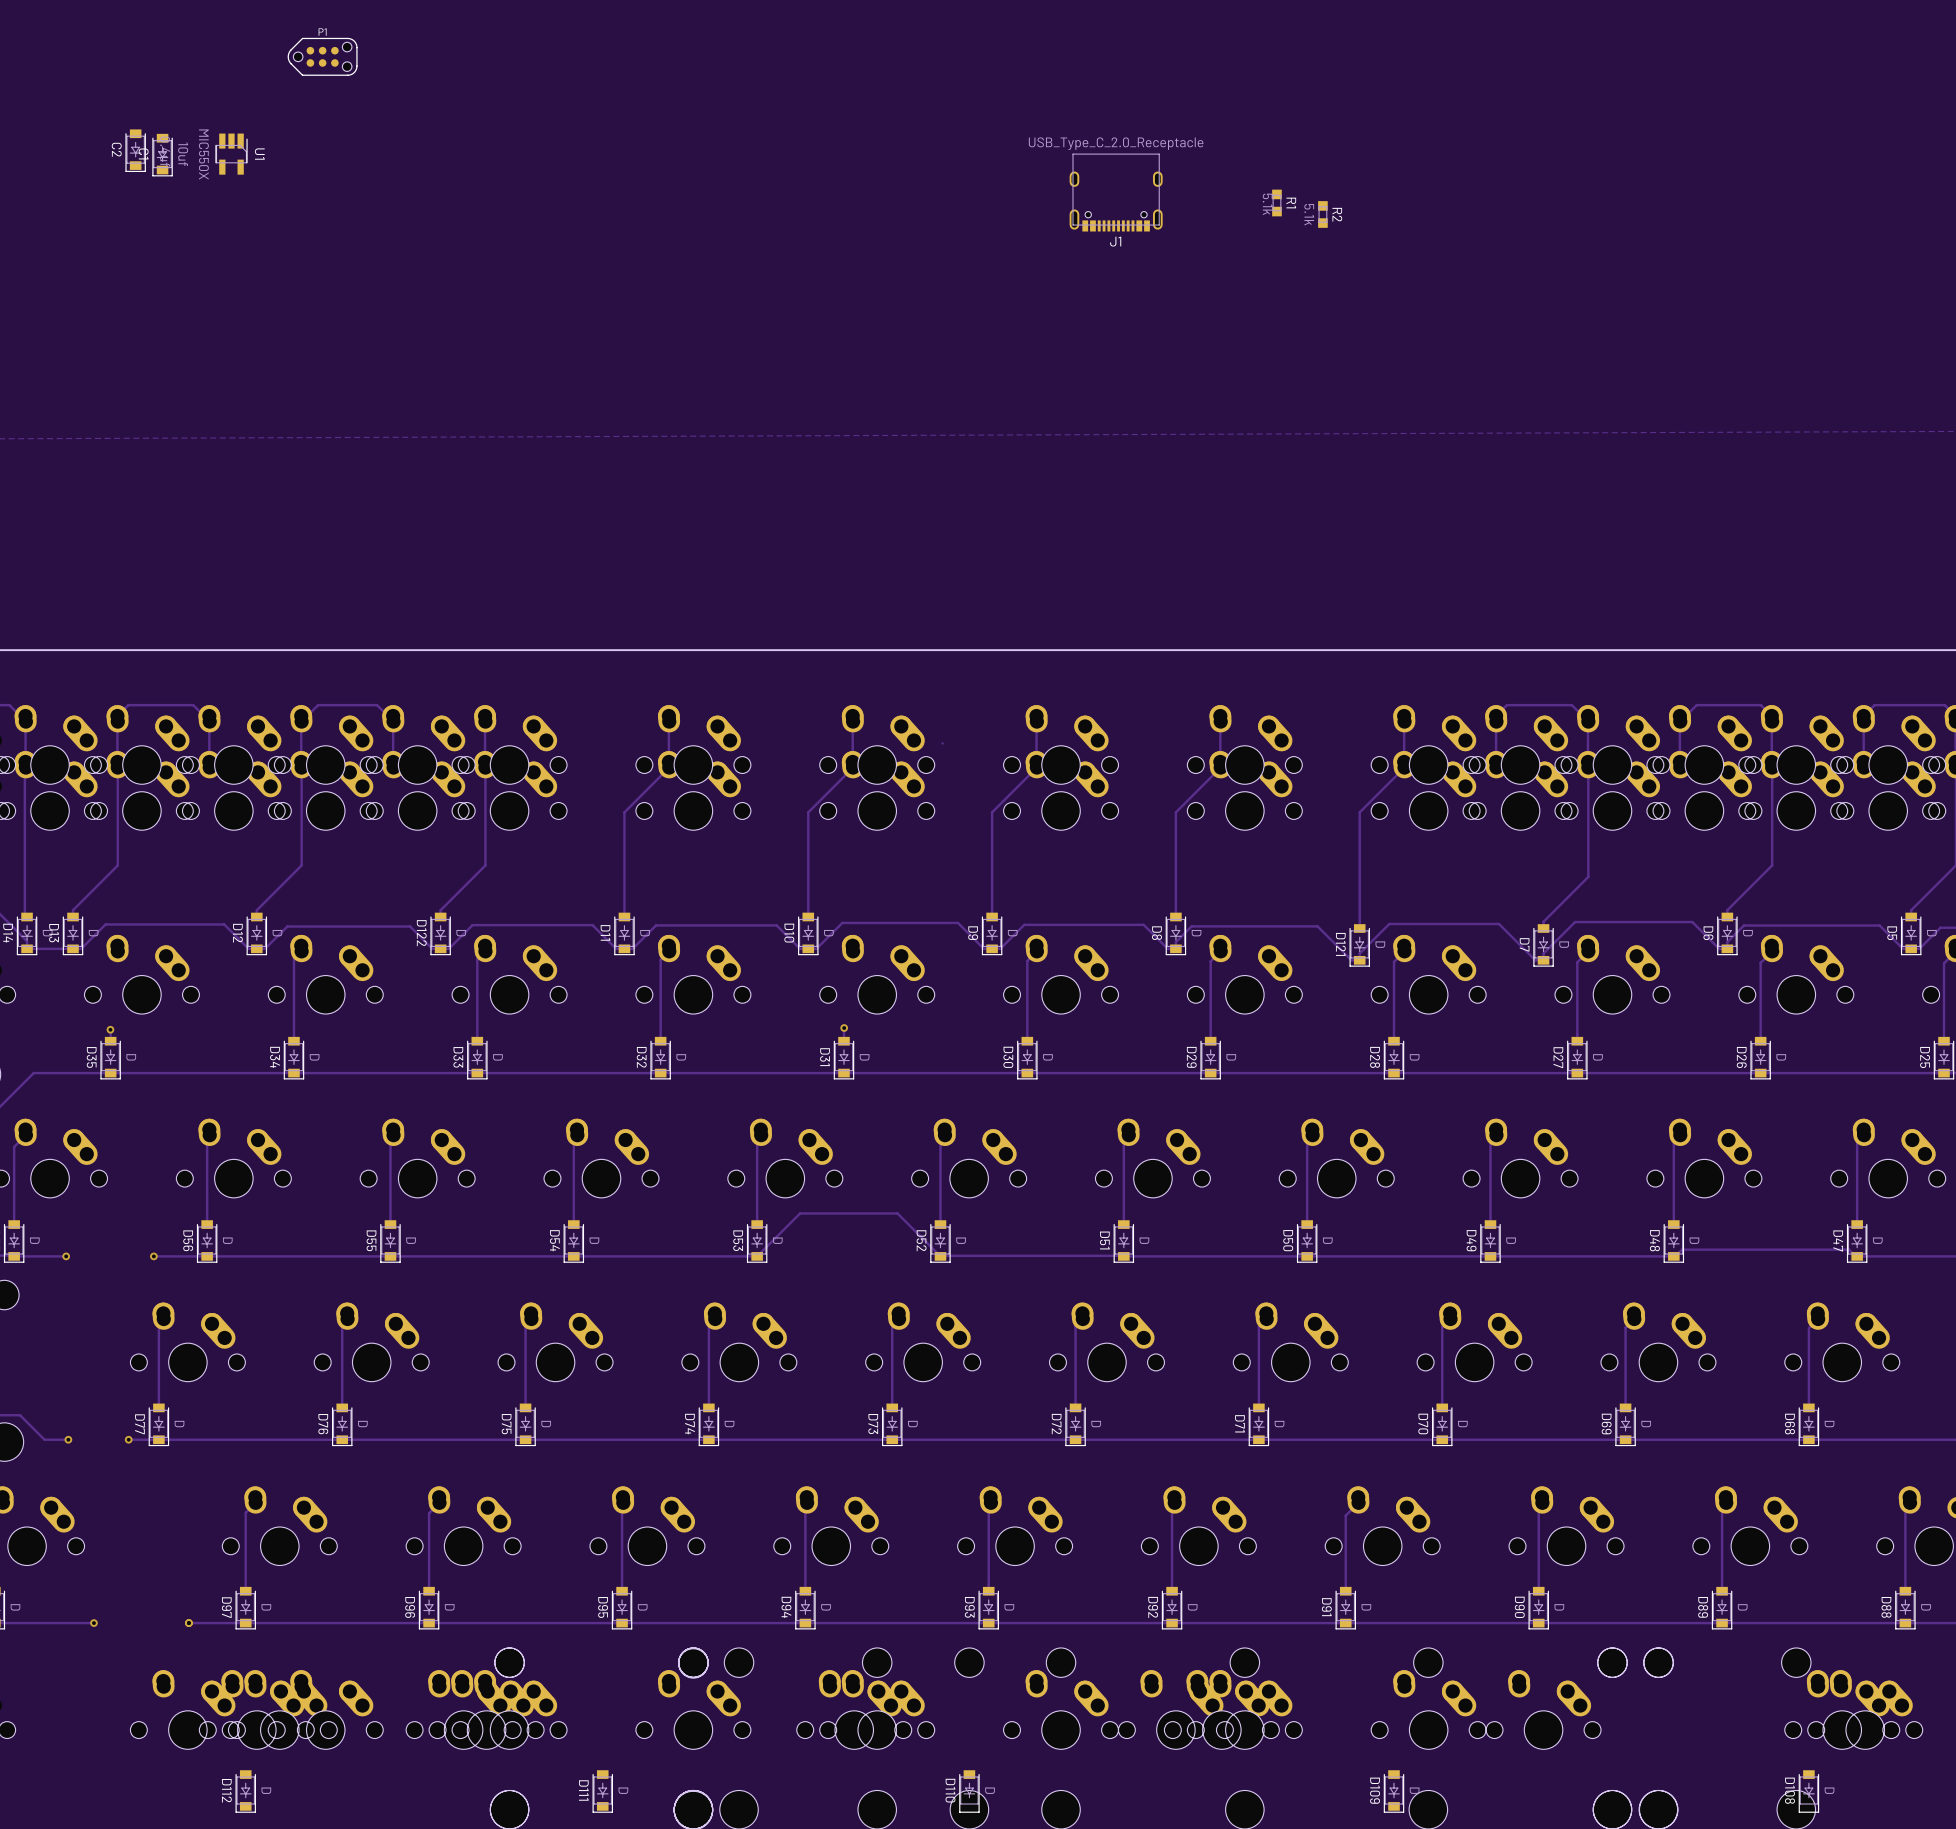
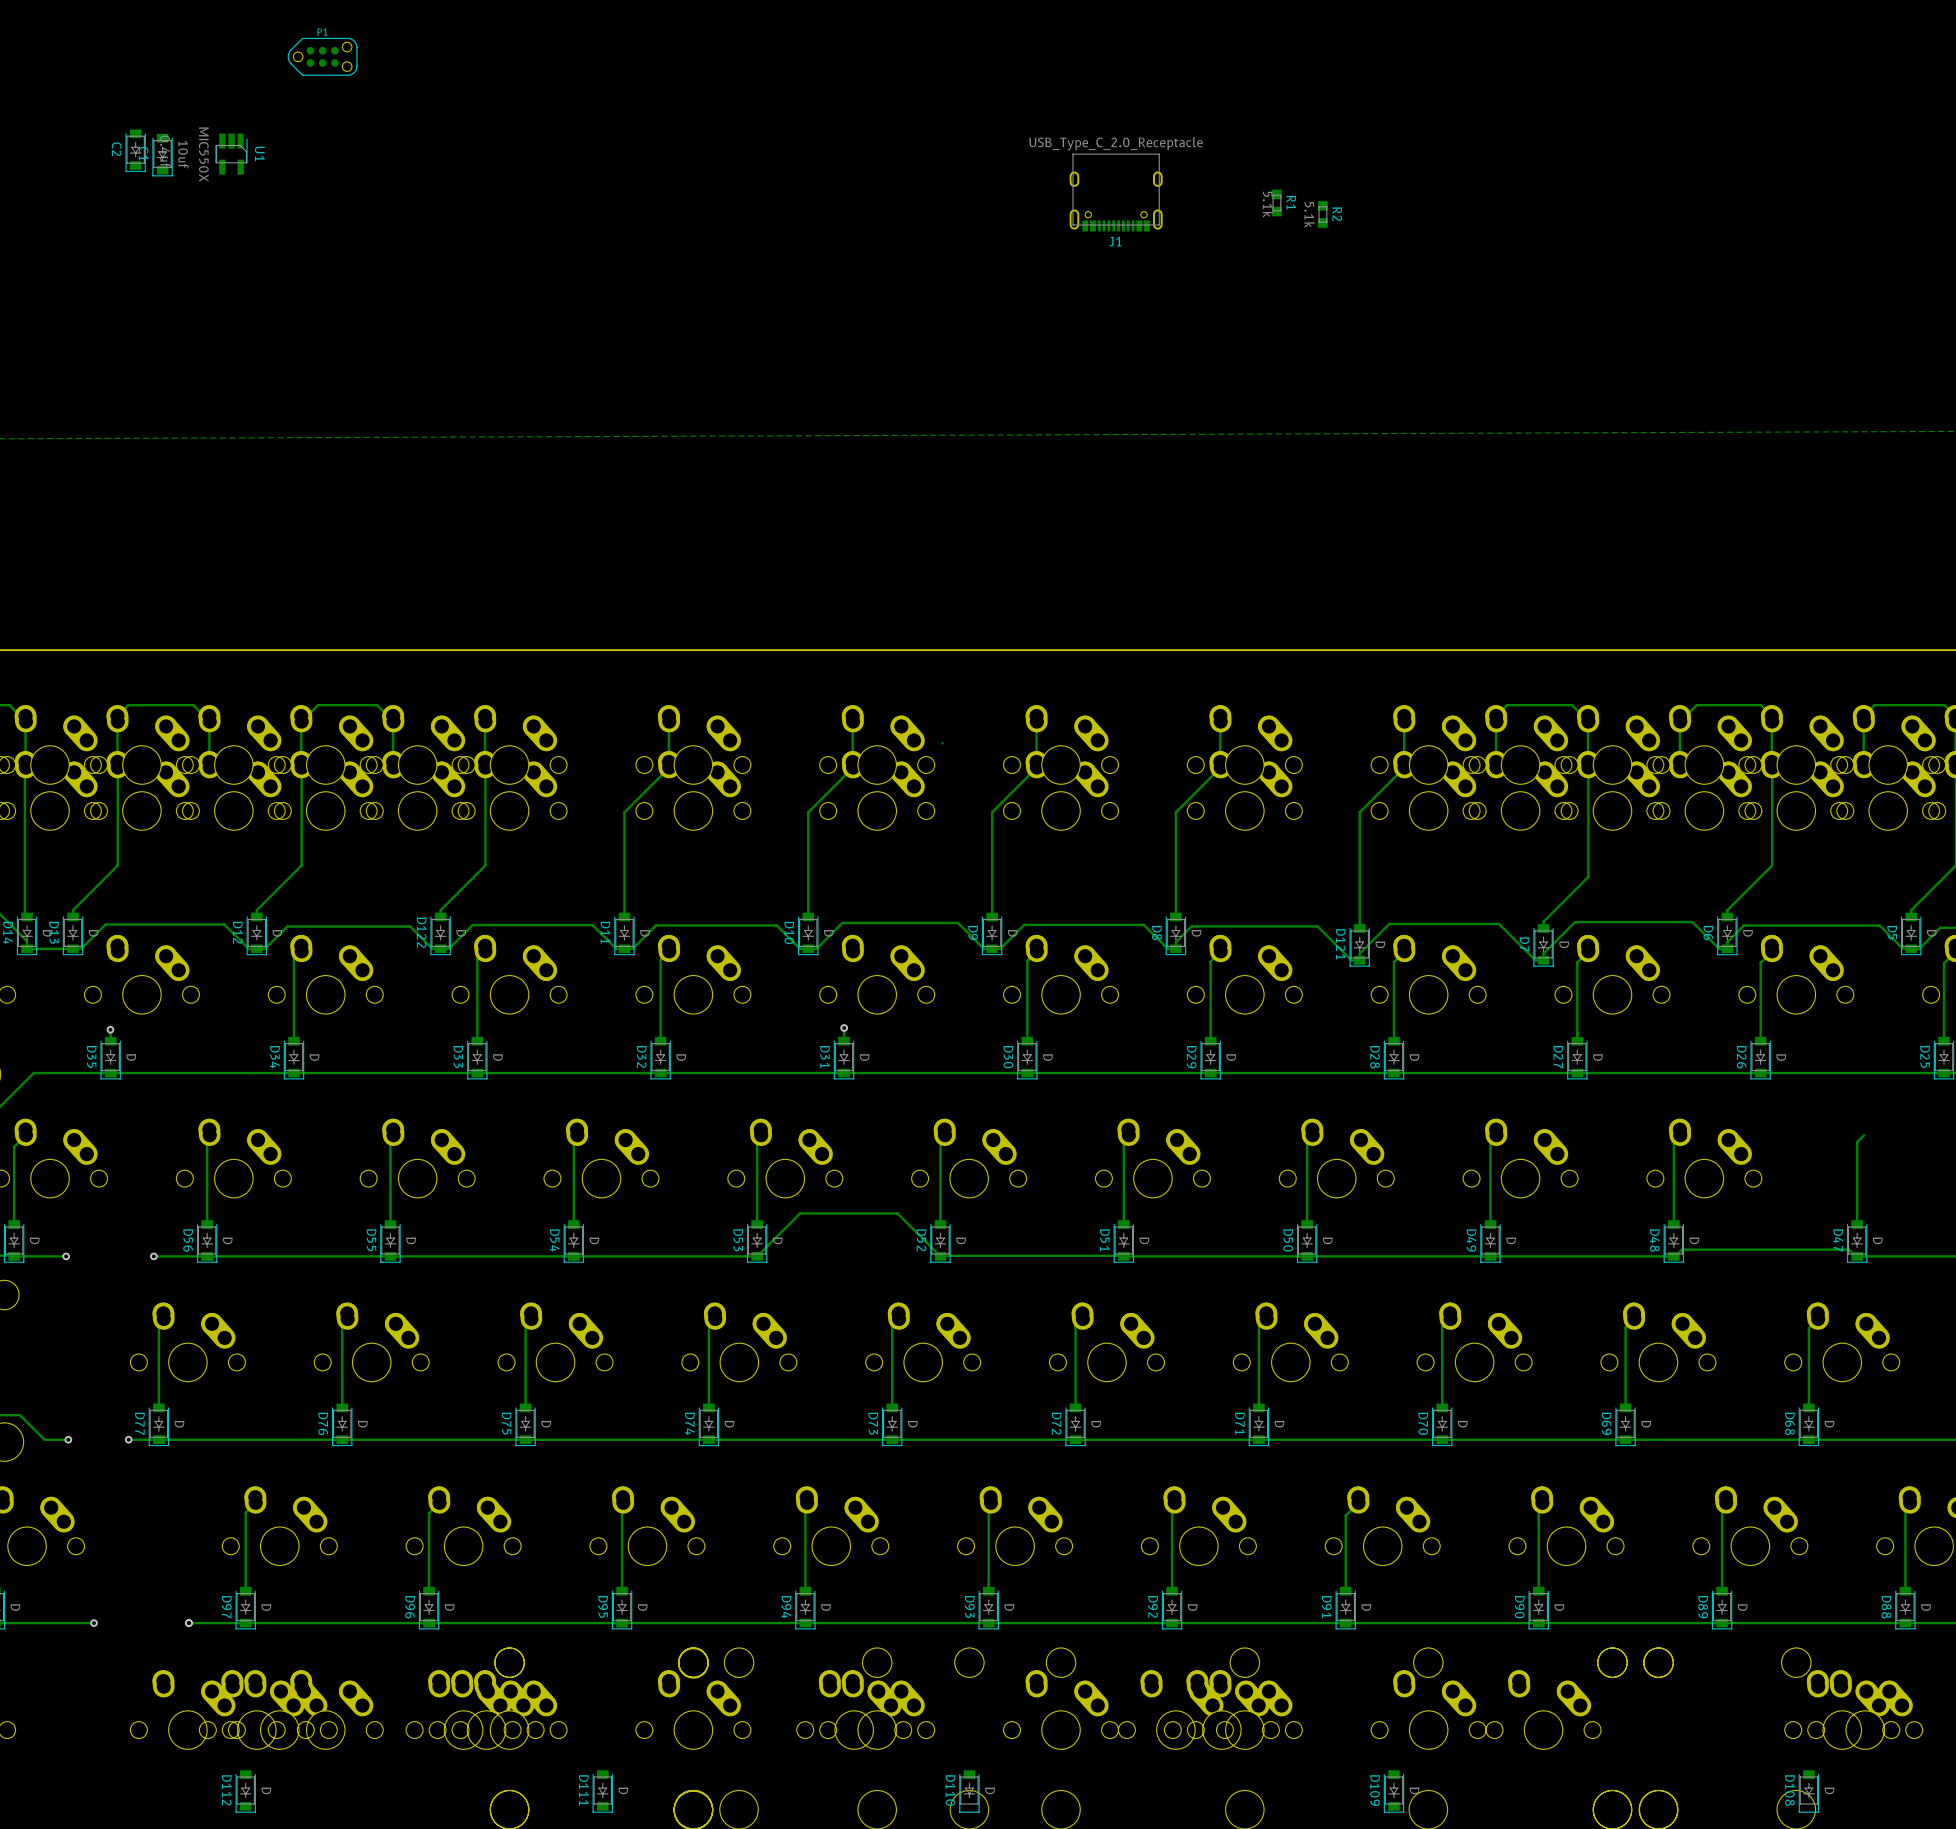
part: (1888, 1158) -> none

